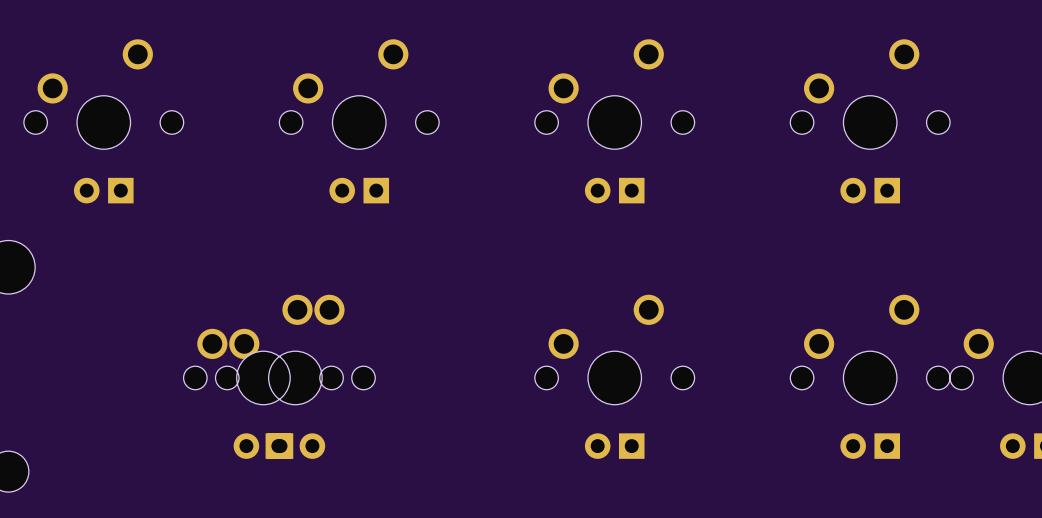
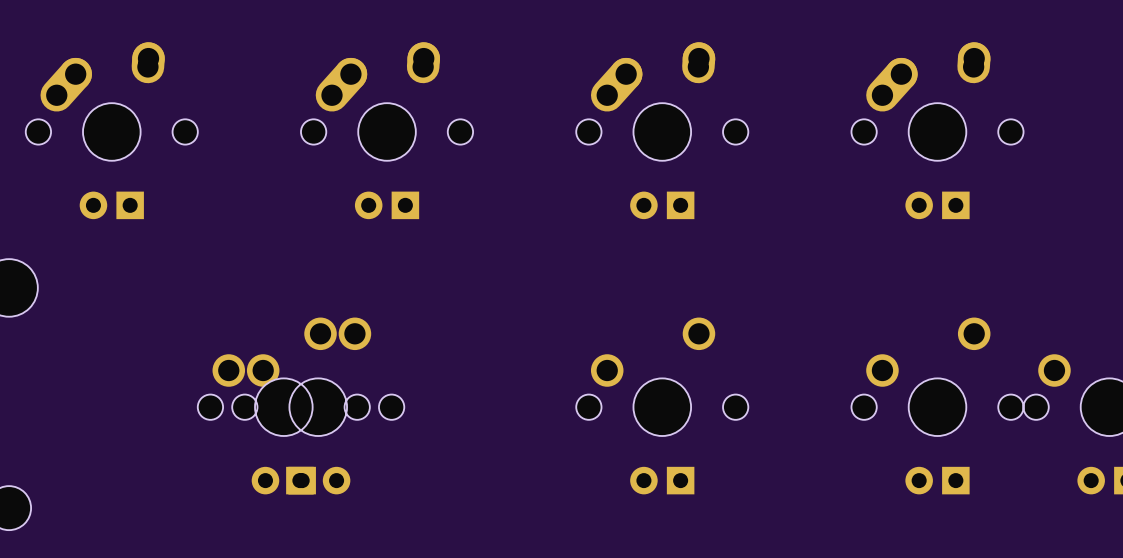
part footprint: [23, 39, 184, 204] -> [25, 42, 198, 220]
part footprint: [279, 39, 440, 204] -> [301, 42, 474, 220]
part footprint: [534, 39, 695, 204] -> [576, 42, 749, 220]
part footprint: [790, 39, 951, 204] -> [851, 42, 1024, 220]

